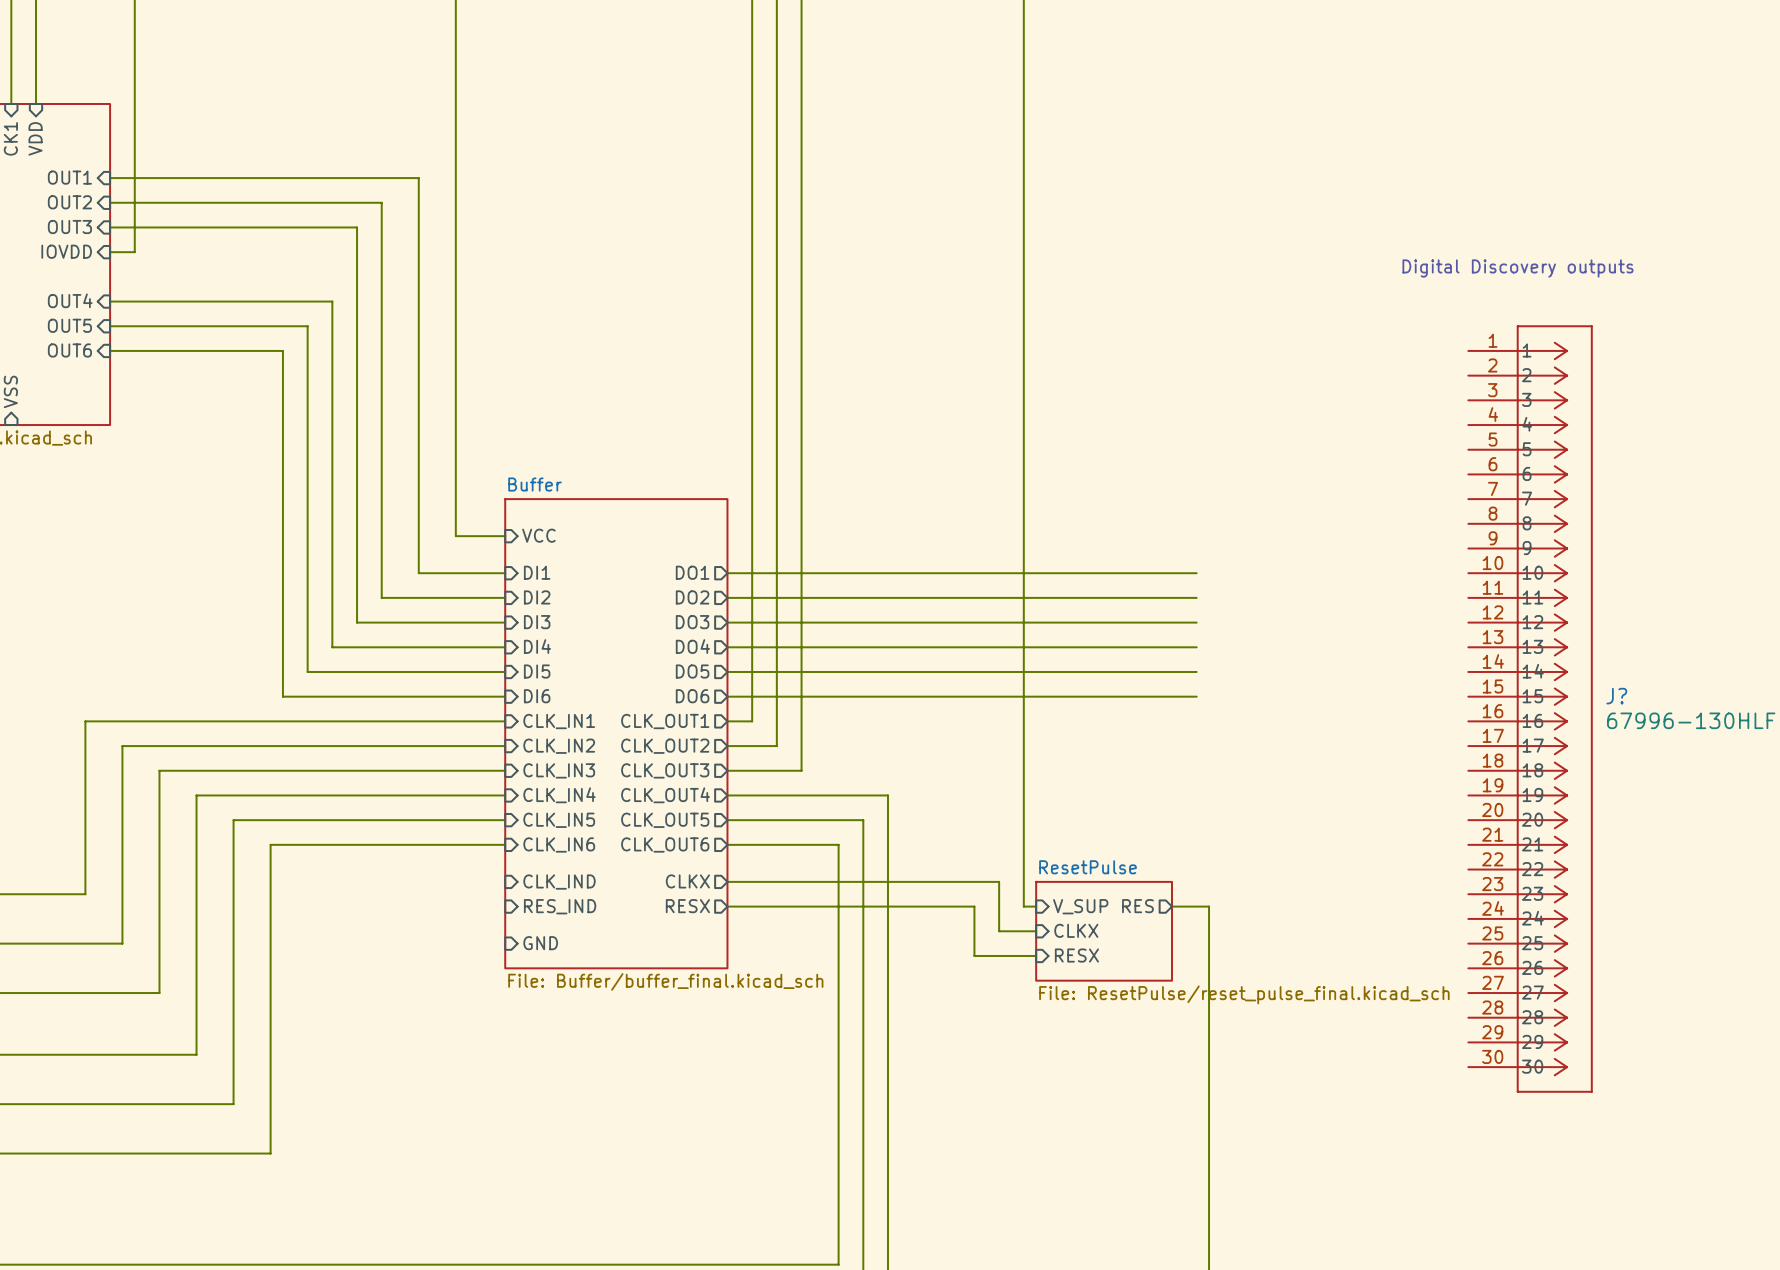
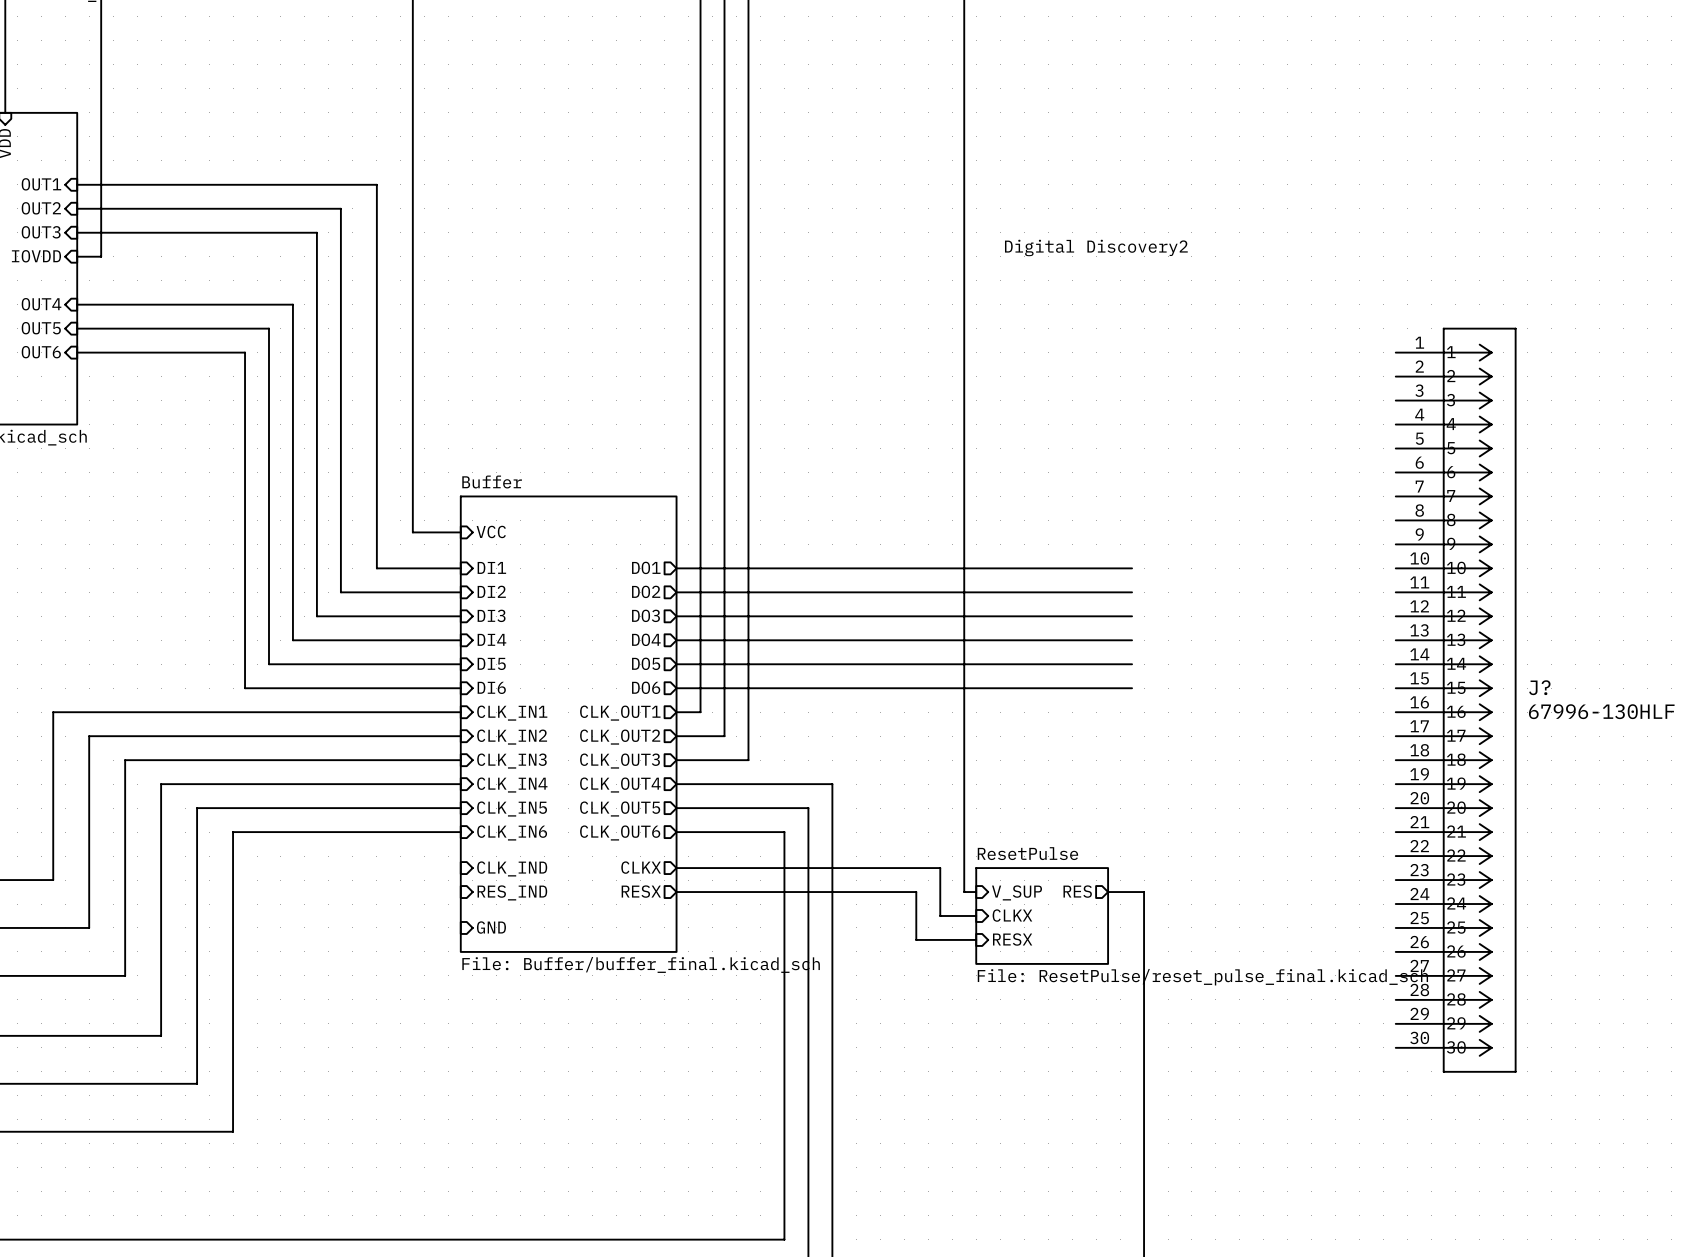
text: none -> Digital Discovery2 (1096, 247)
text: Digital Discovery outputs (1518, 268) -> none

